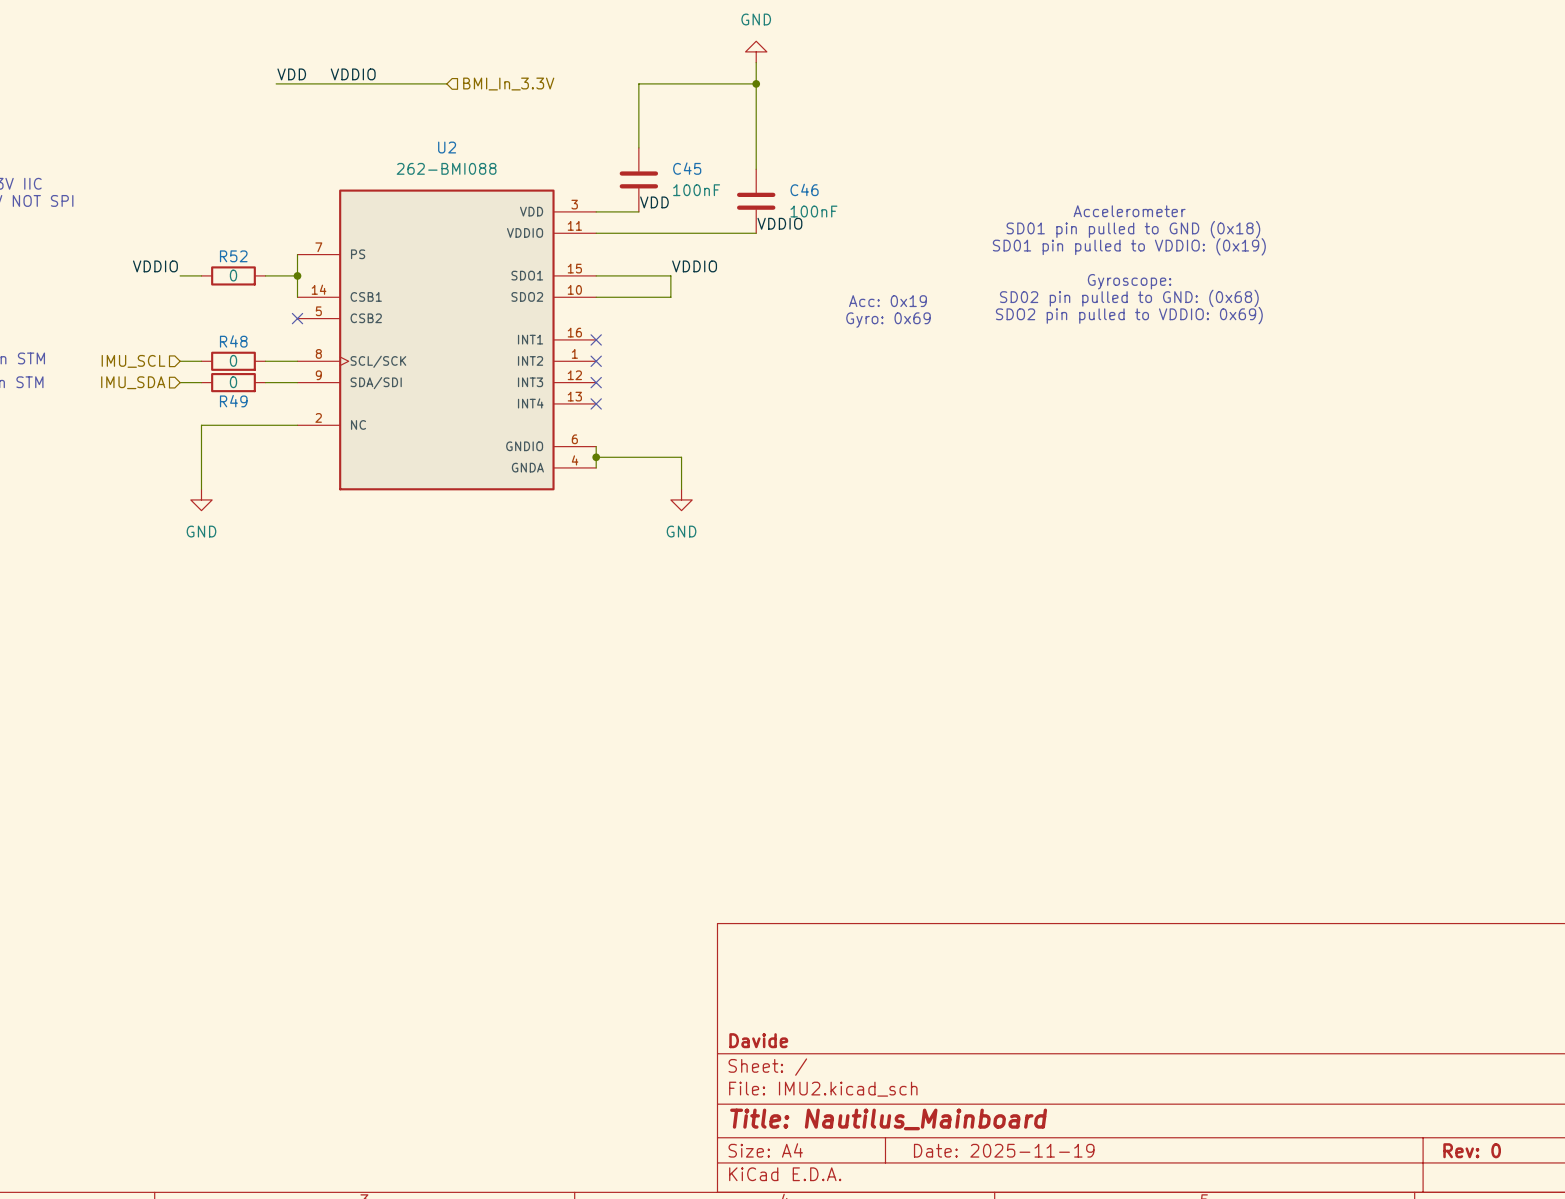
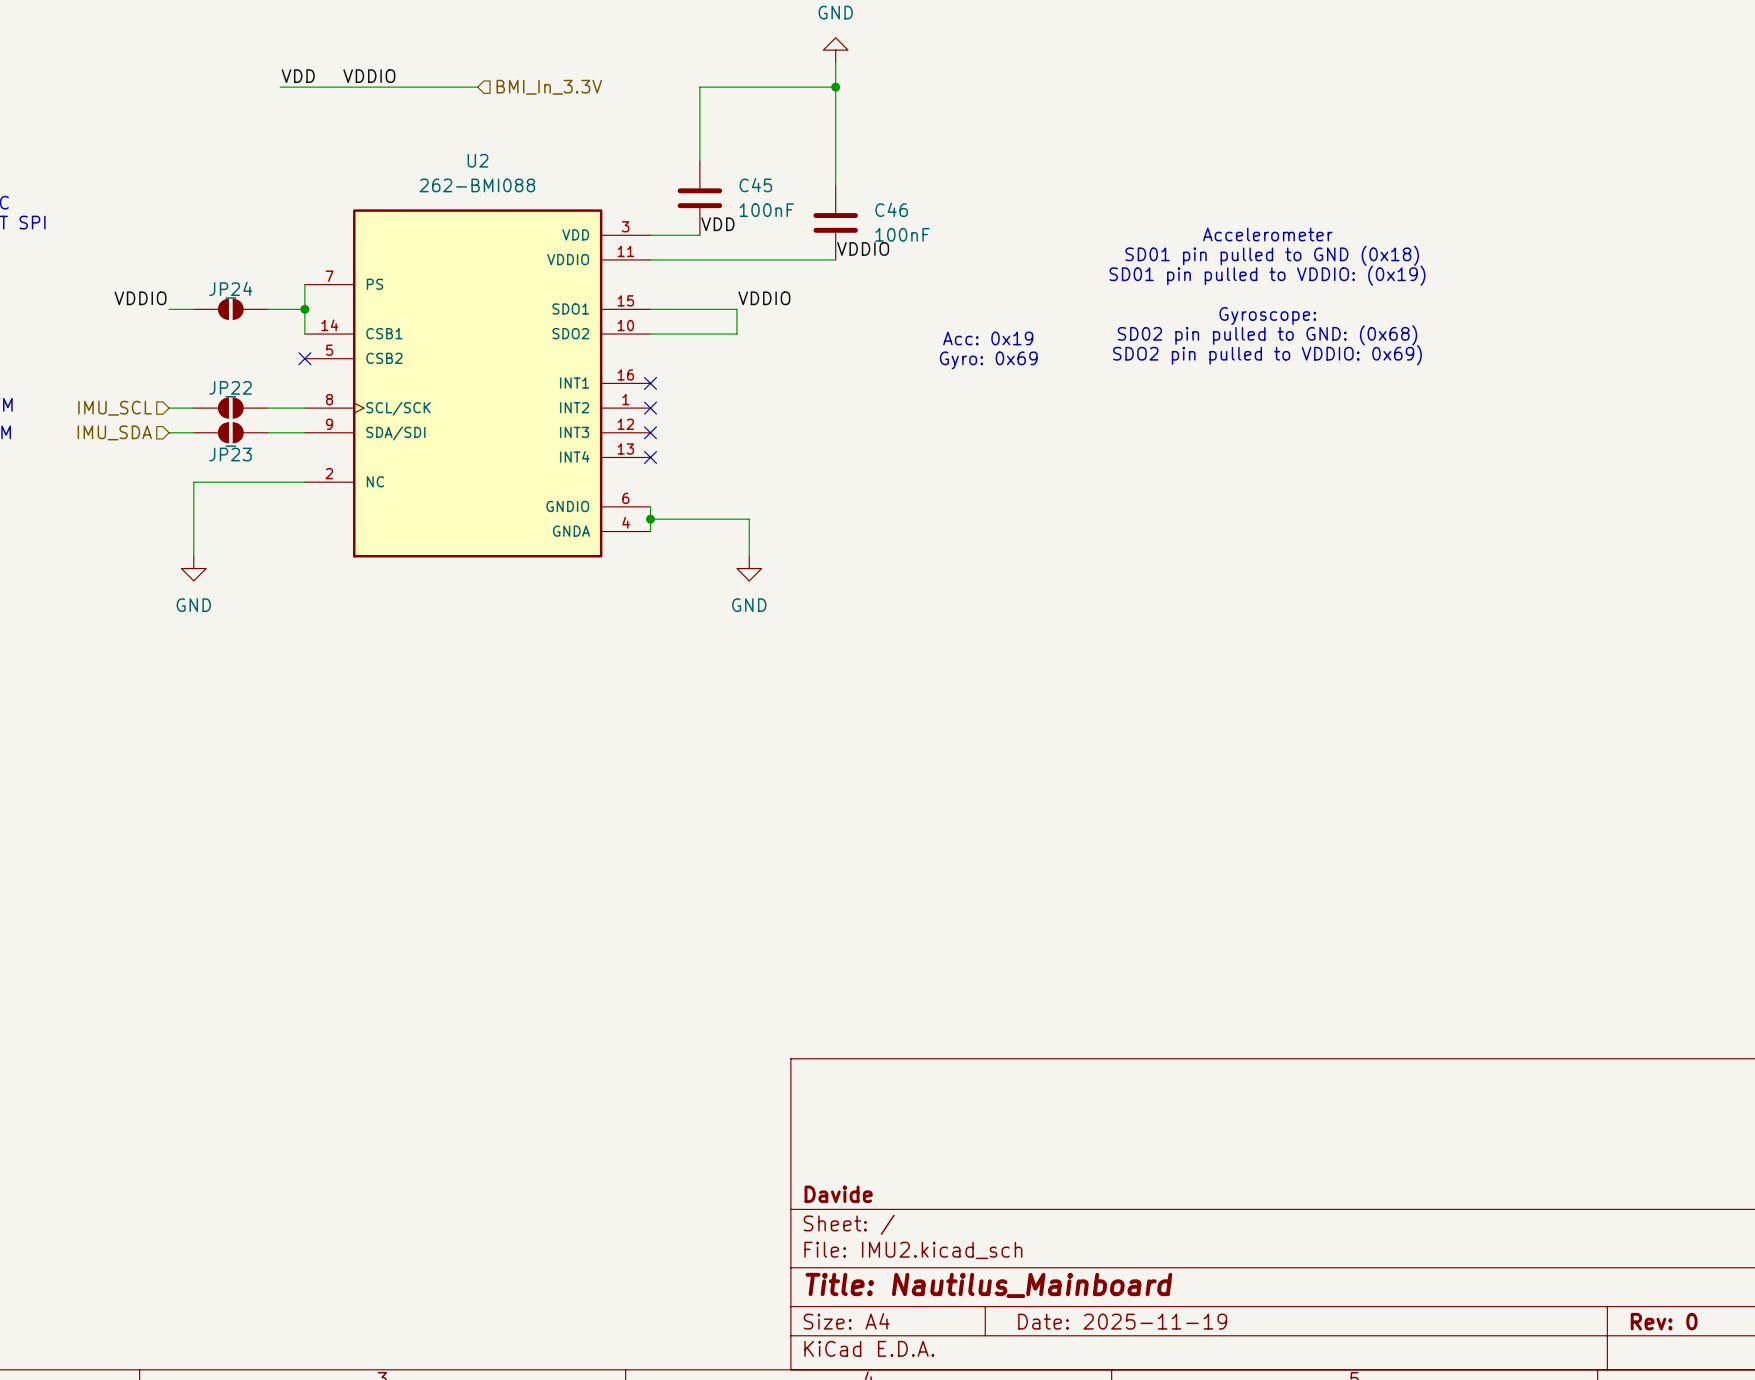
R52: 0 (233, 275) -> none
JP24: none -> - (230, 309)
R48: 0 (233, 361) -> none
JP22: none -> - (230, 408)
R49: 0 (233, 382) -> none
JP23: none -> - (230, 432)

